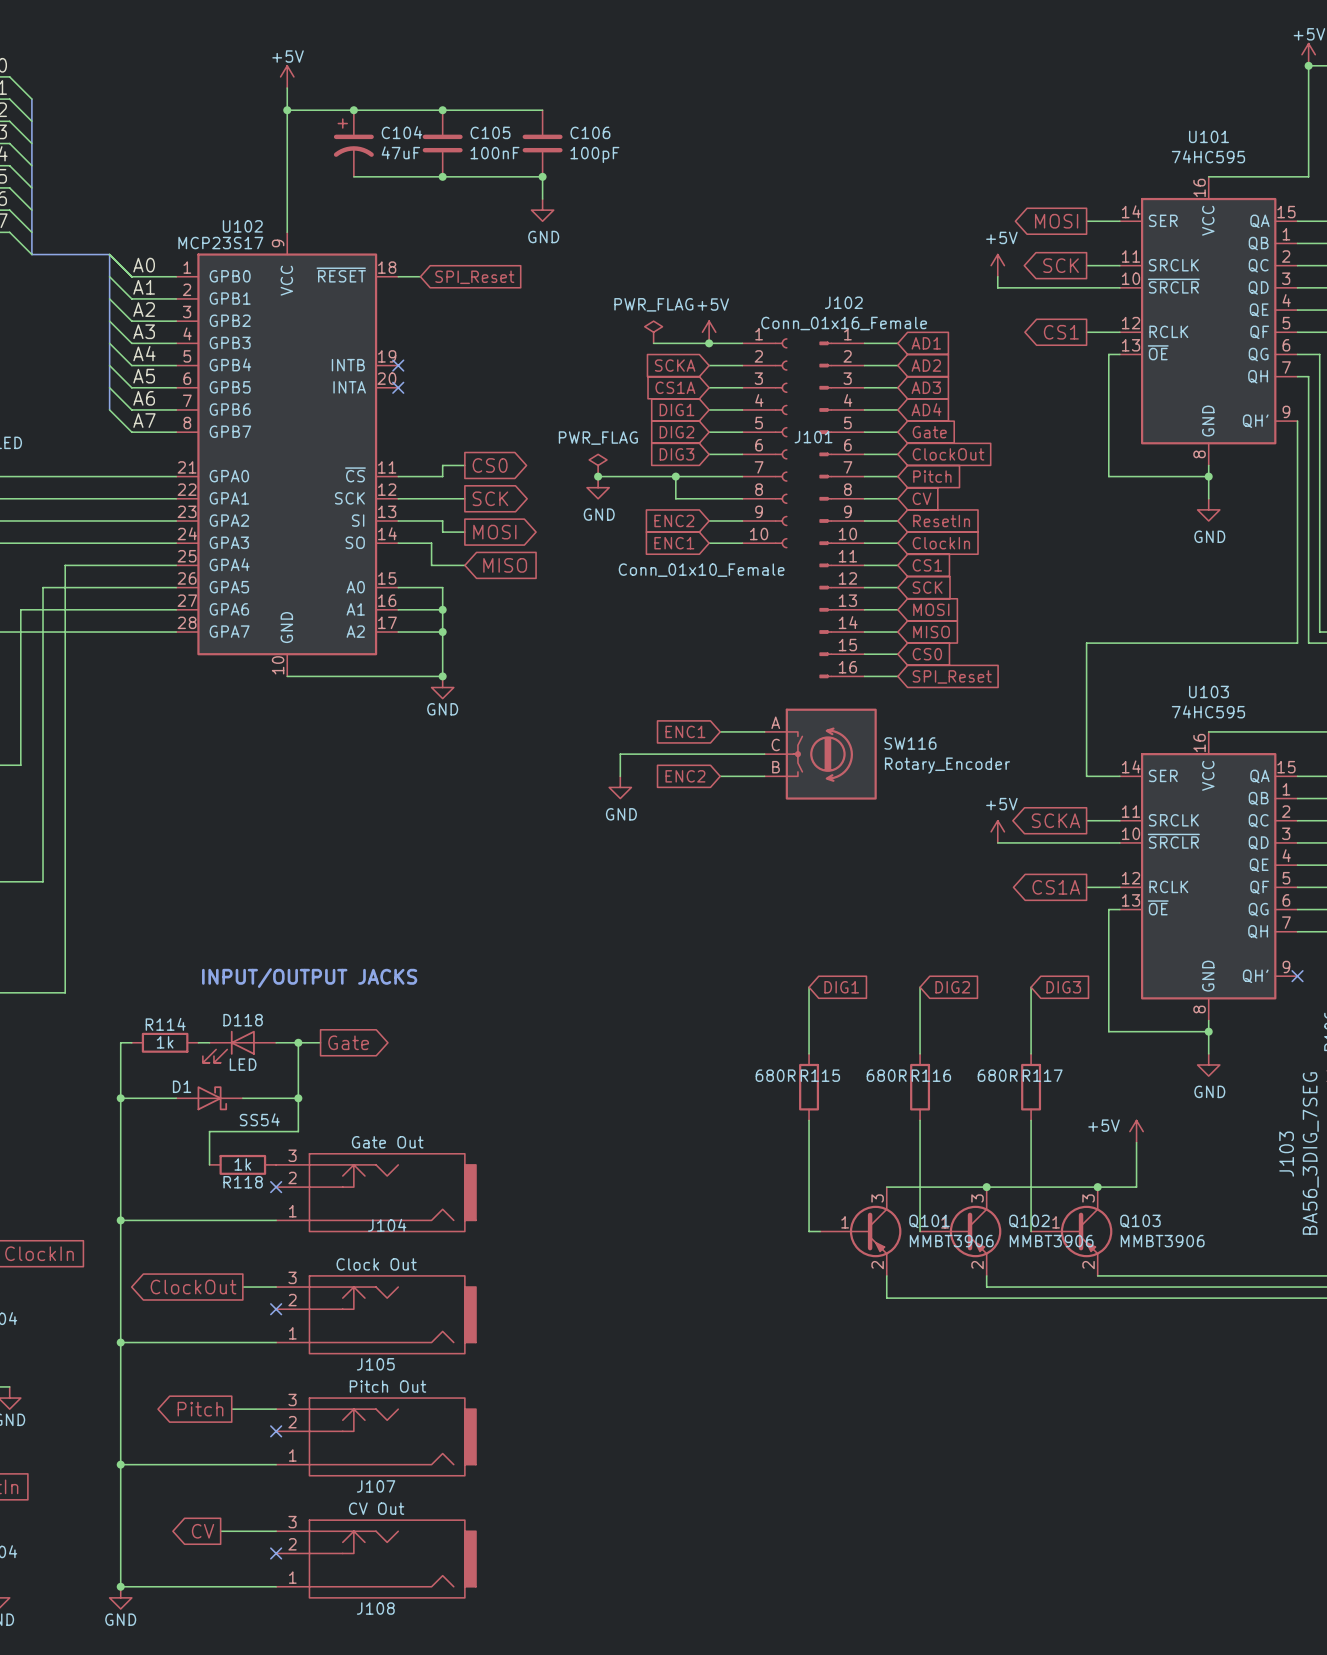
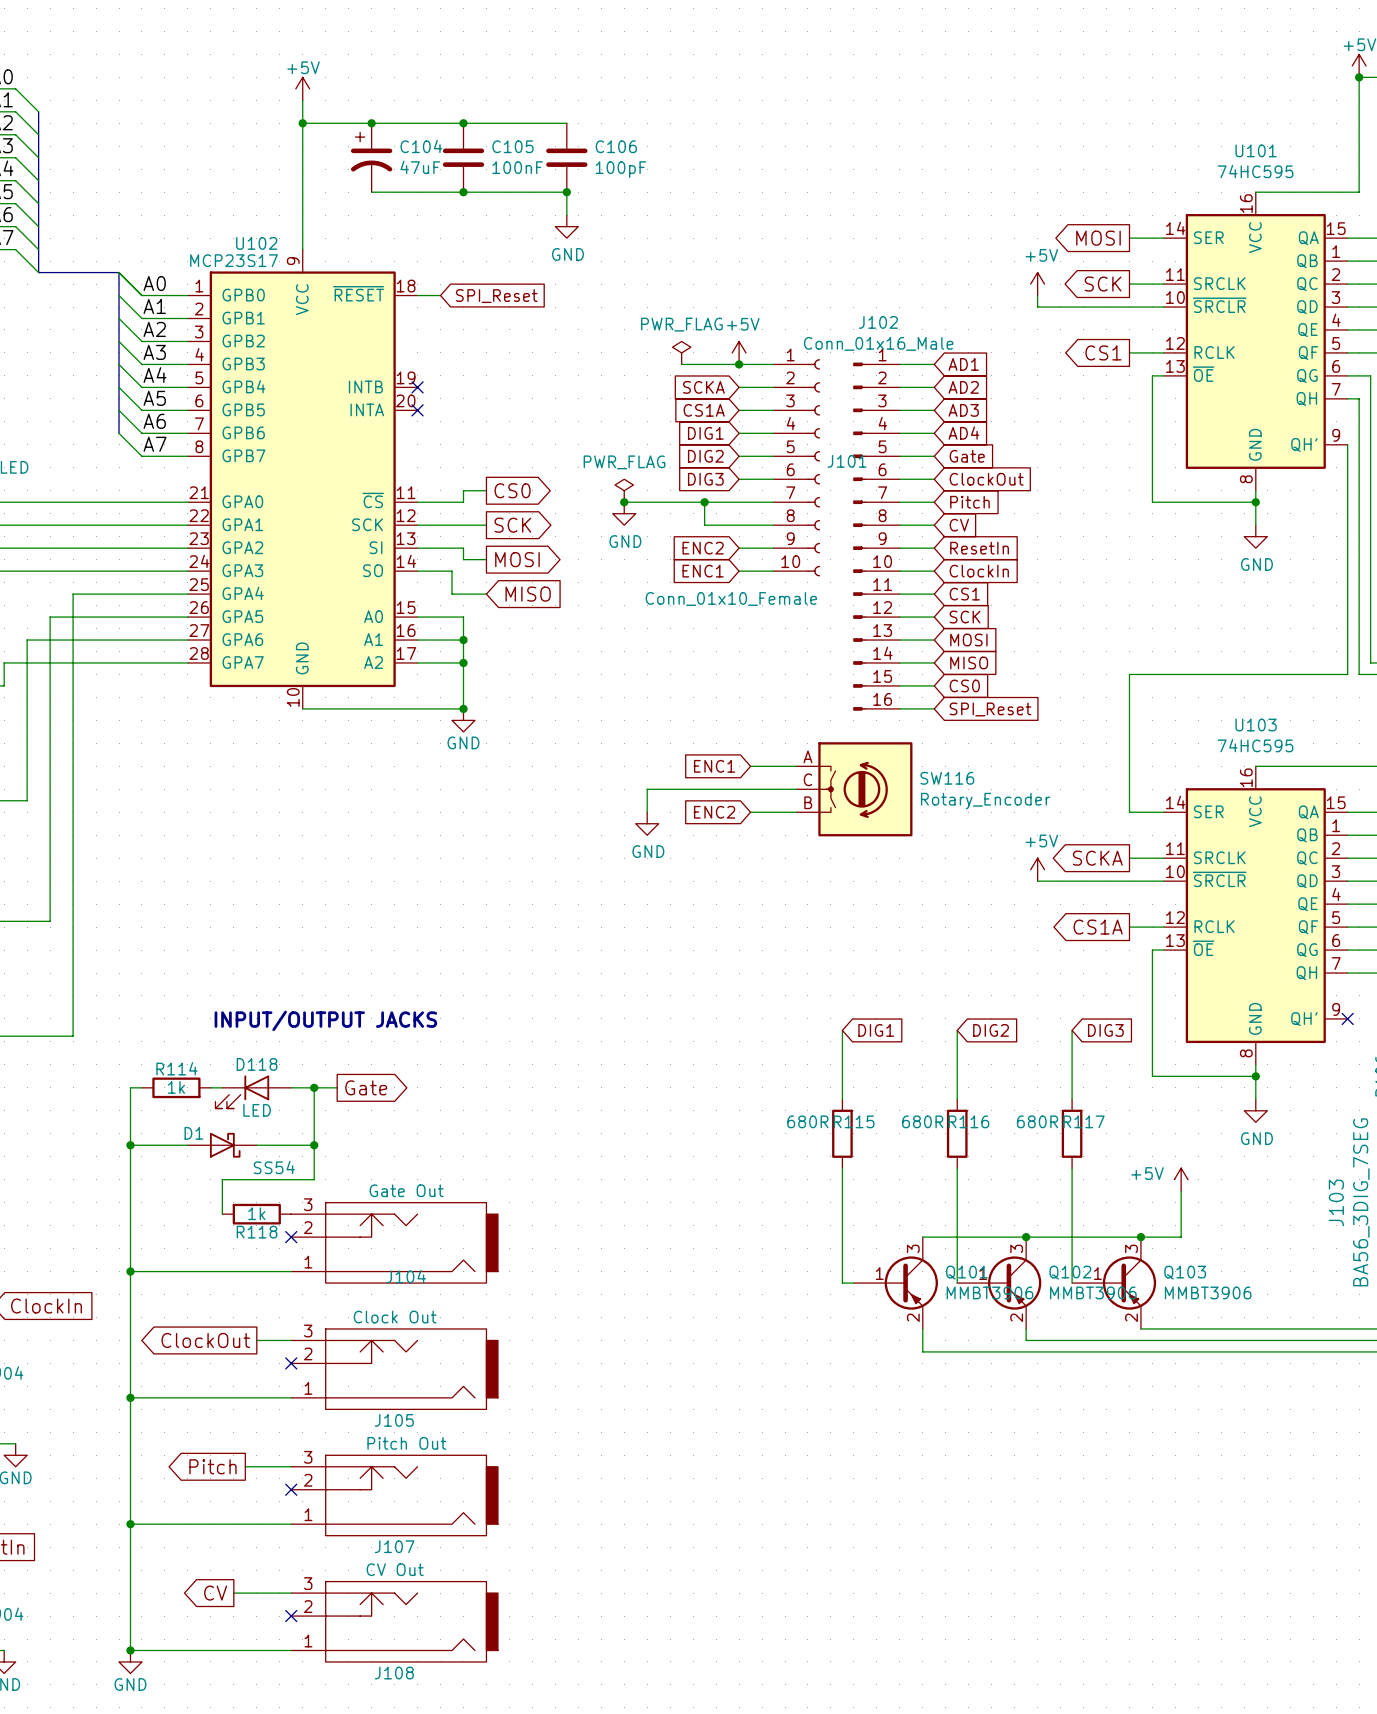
J102 value: Conn_01x16_Female (844, 323) -> Conn_01x16_Male (878, 343)

